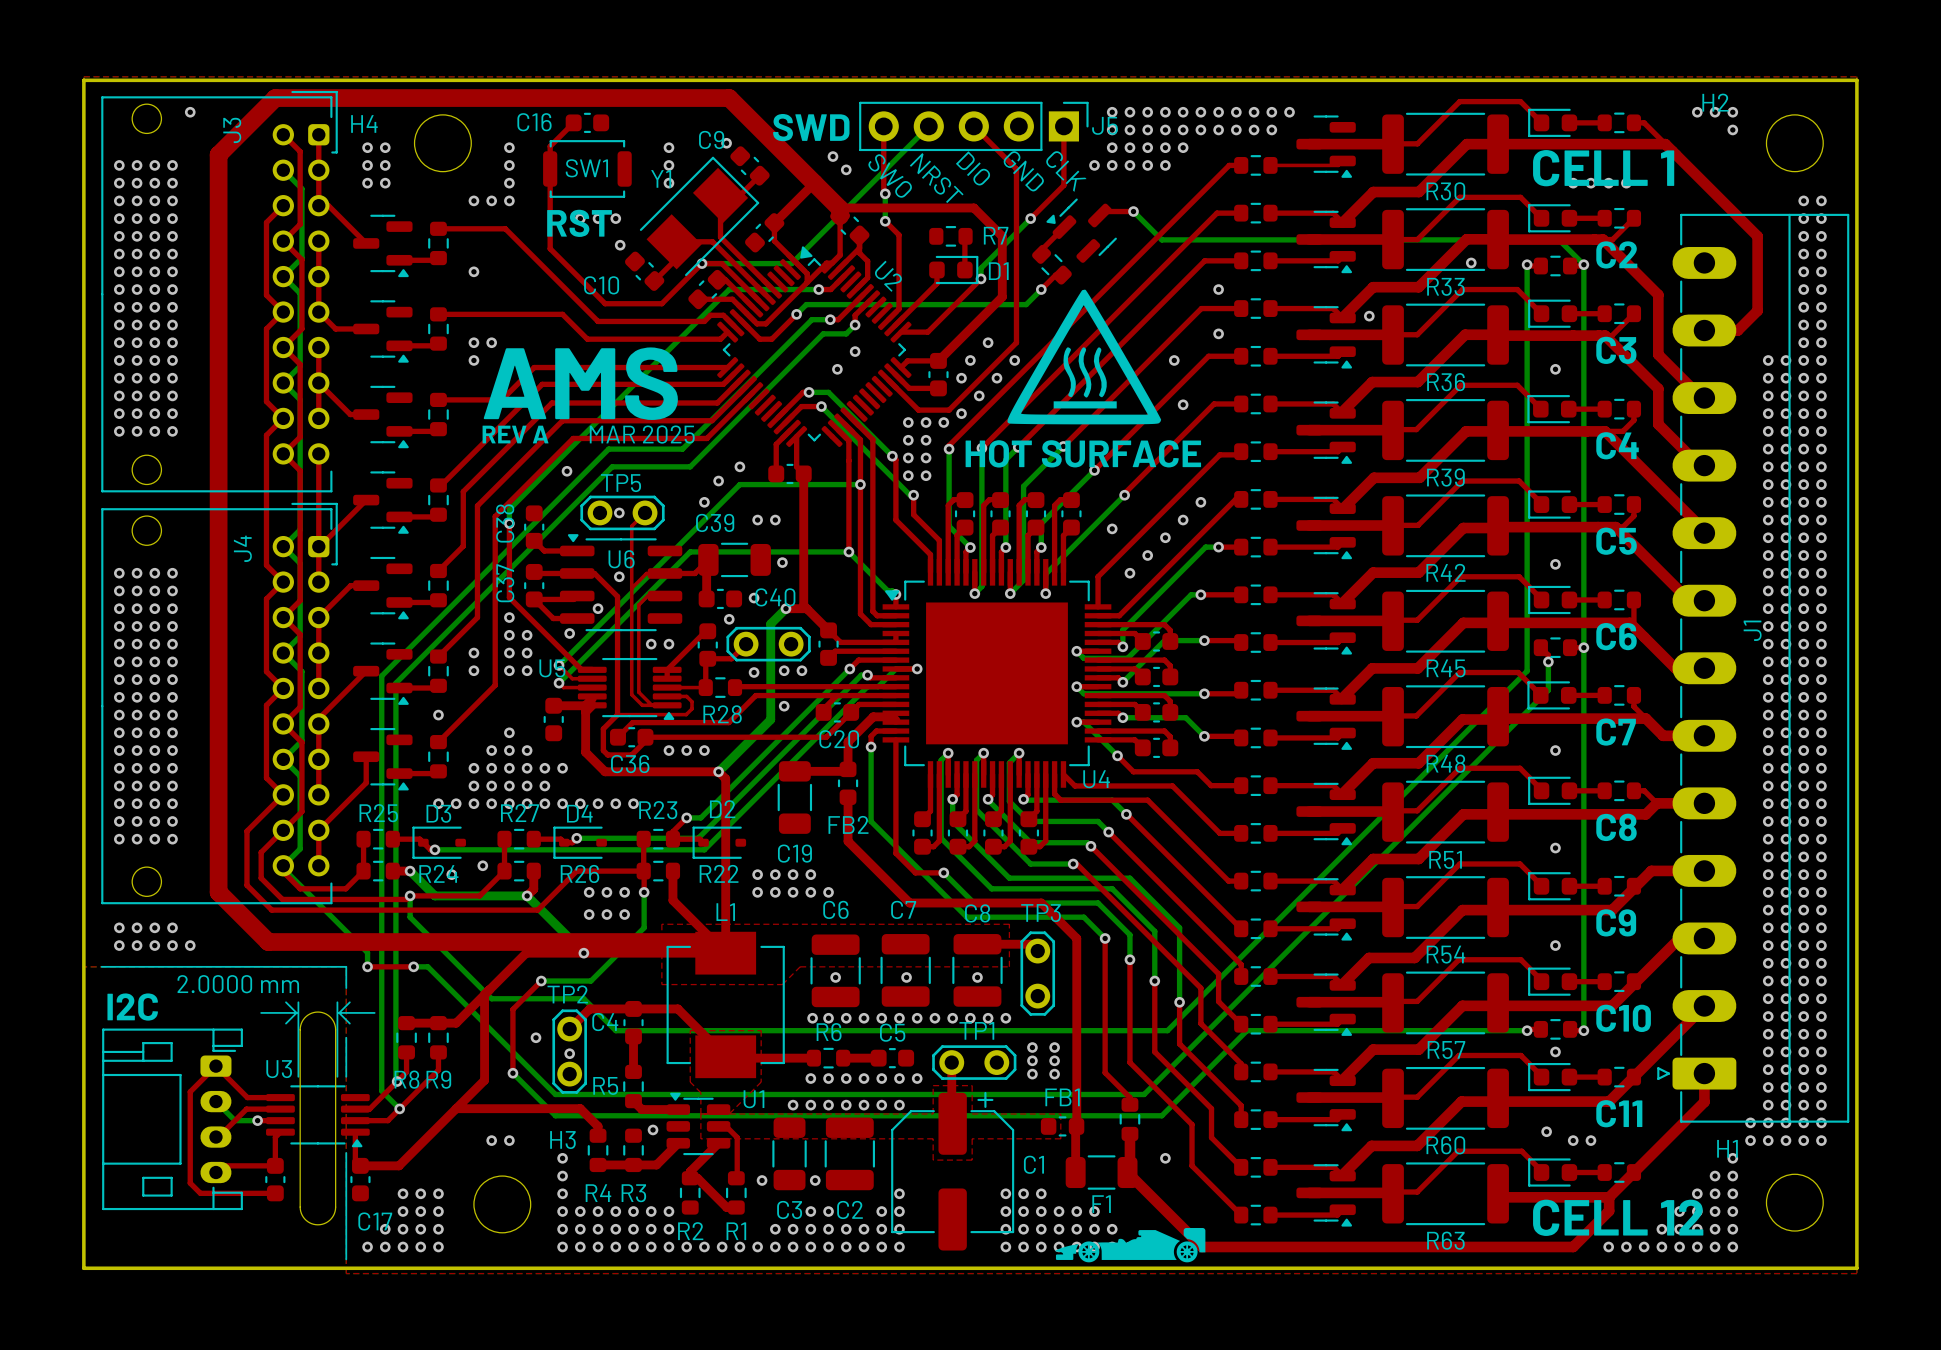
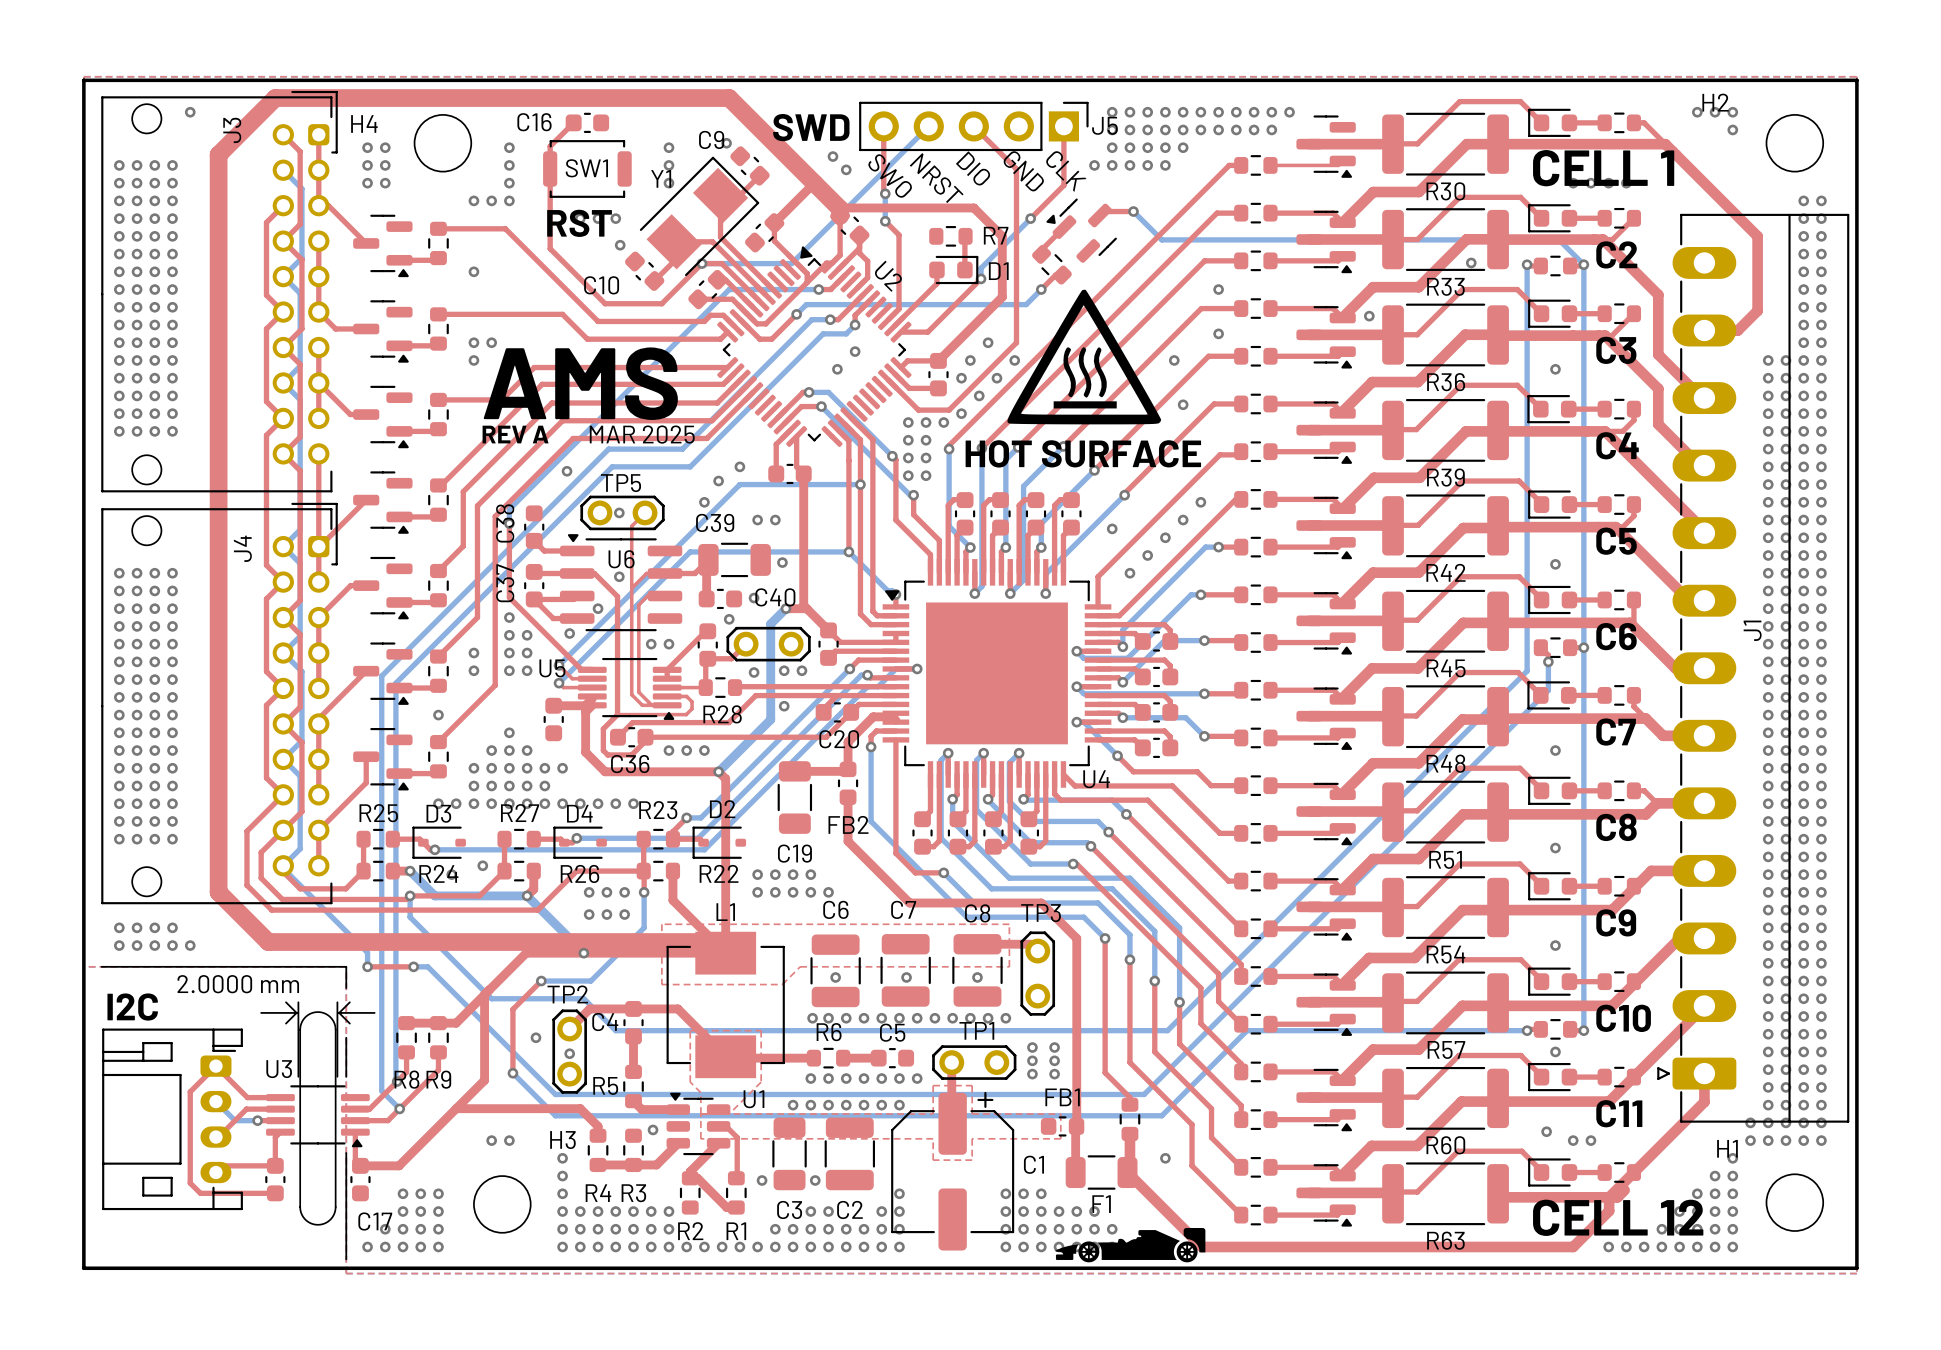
top track: none -> (1624, 1190) (1617, 1197) (1609, 1197)

